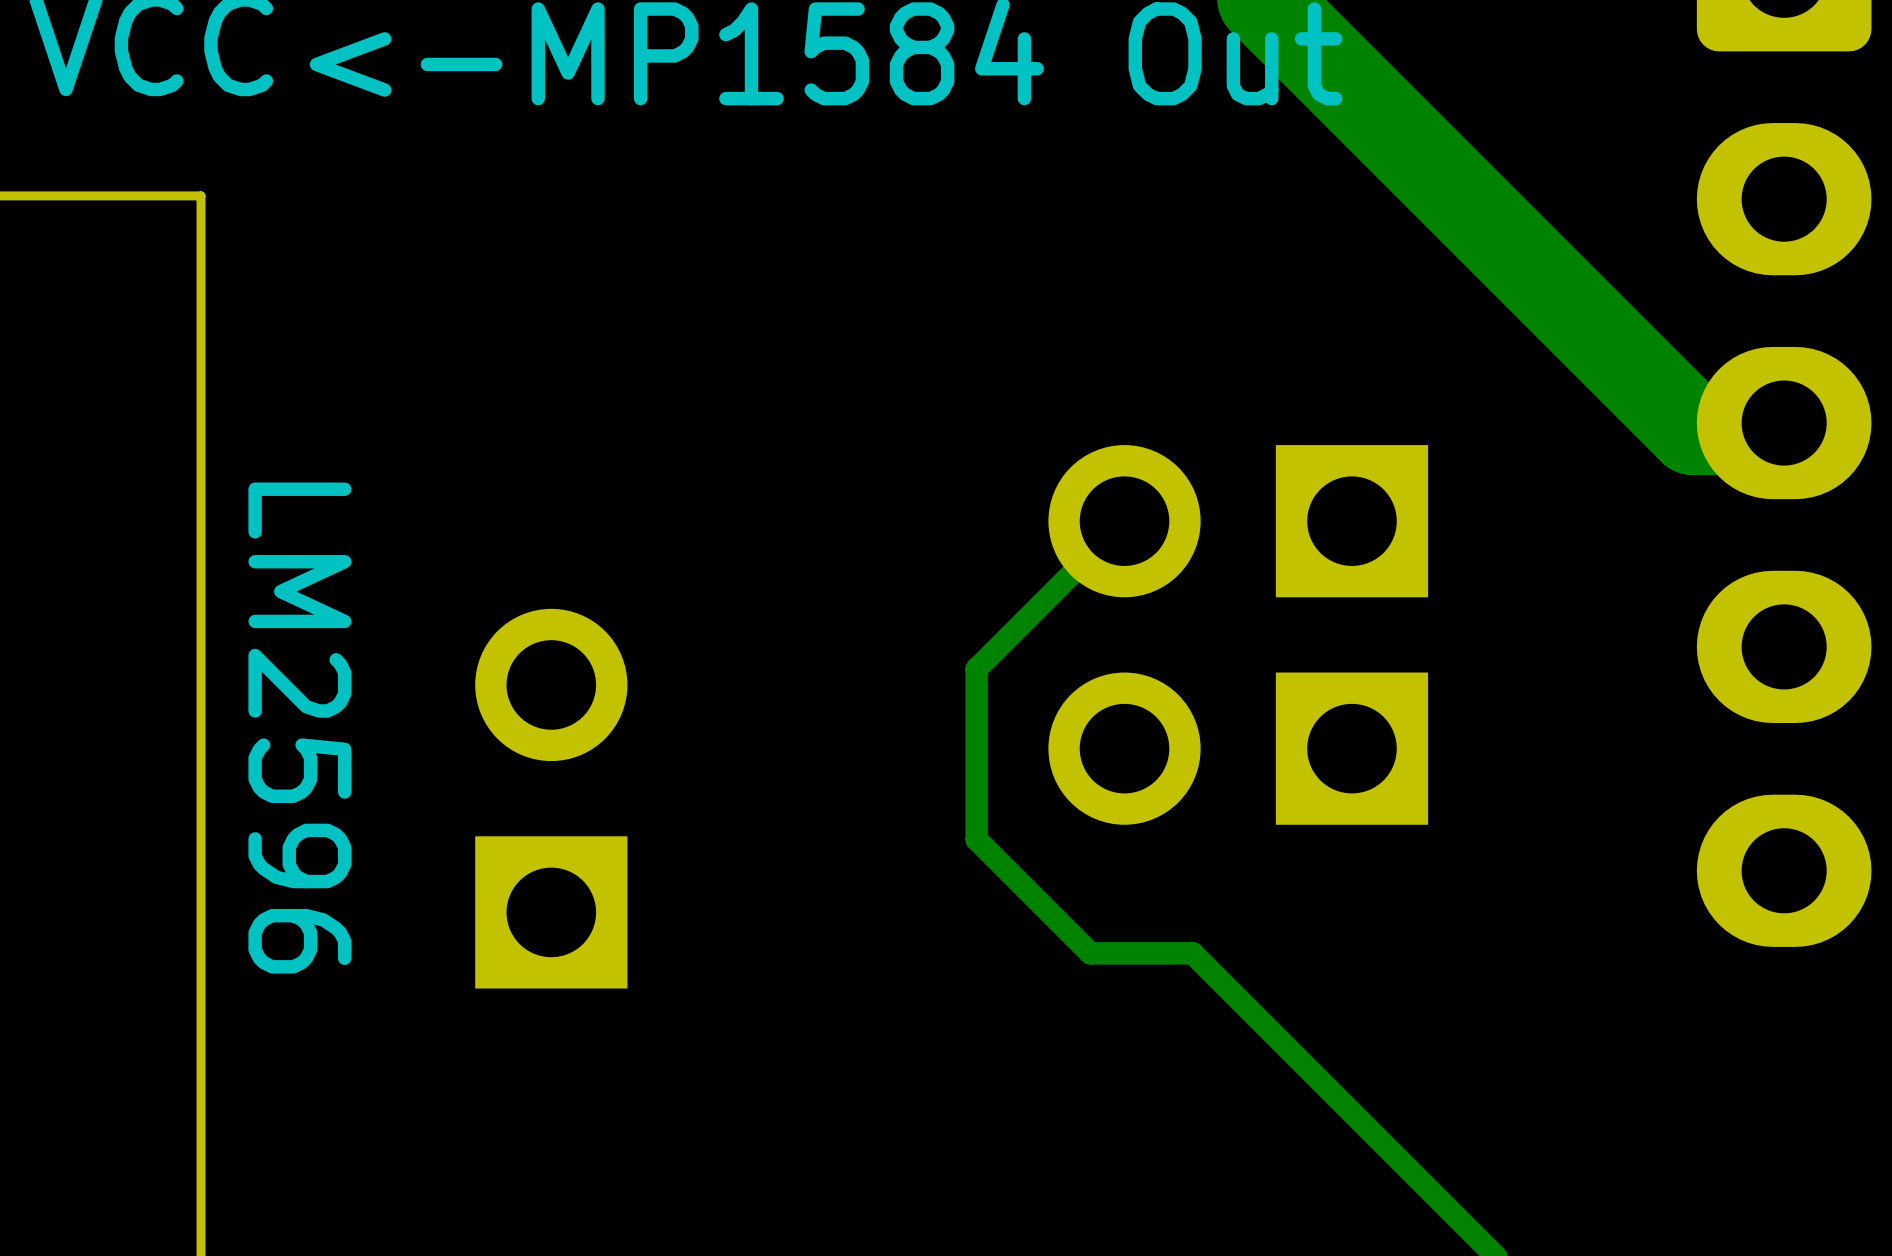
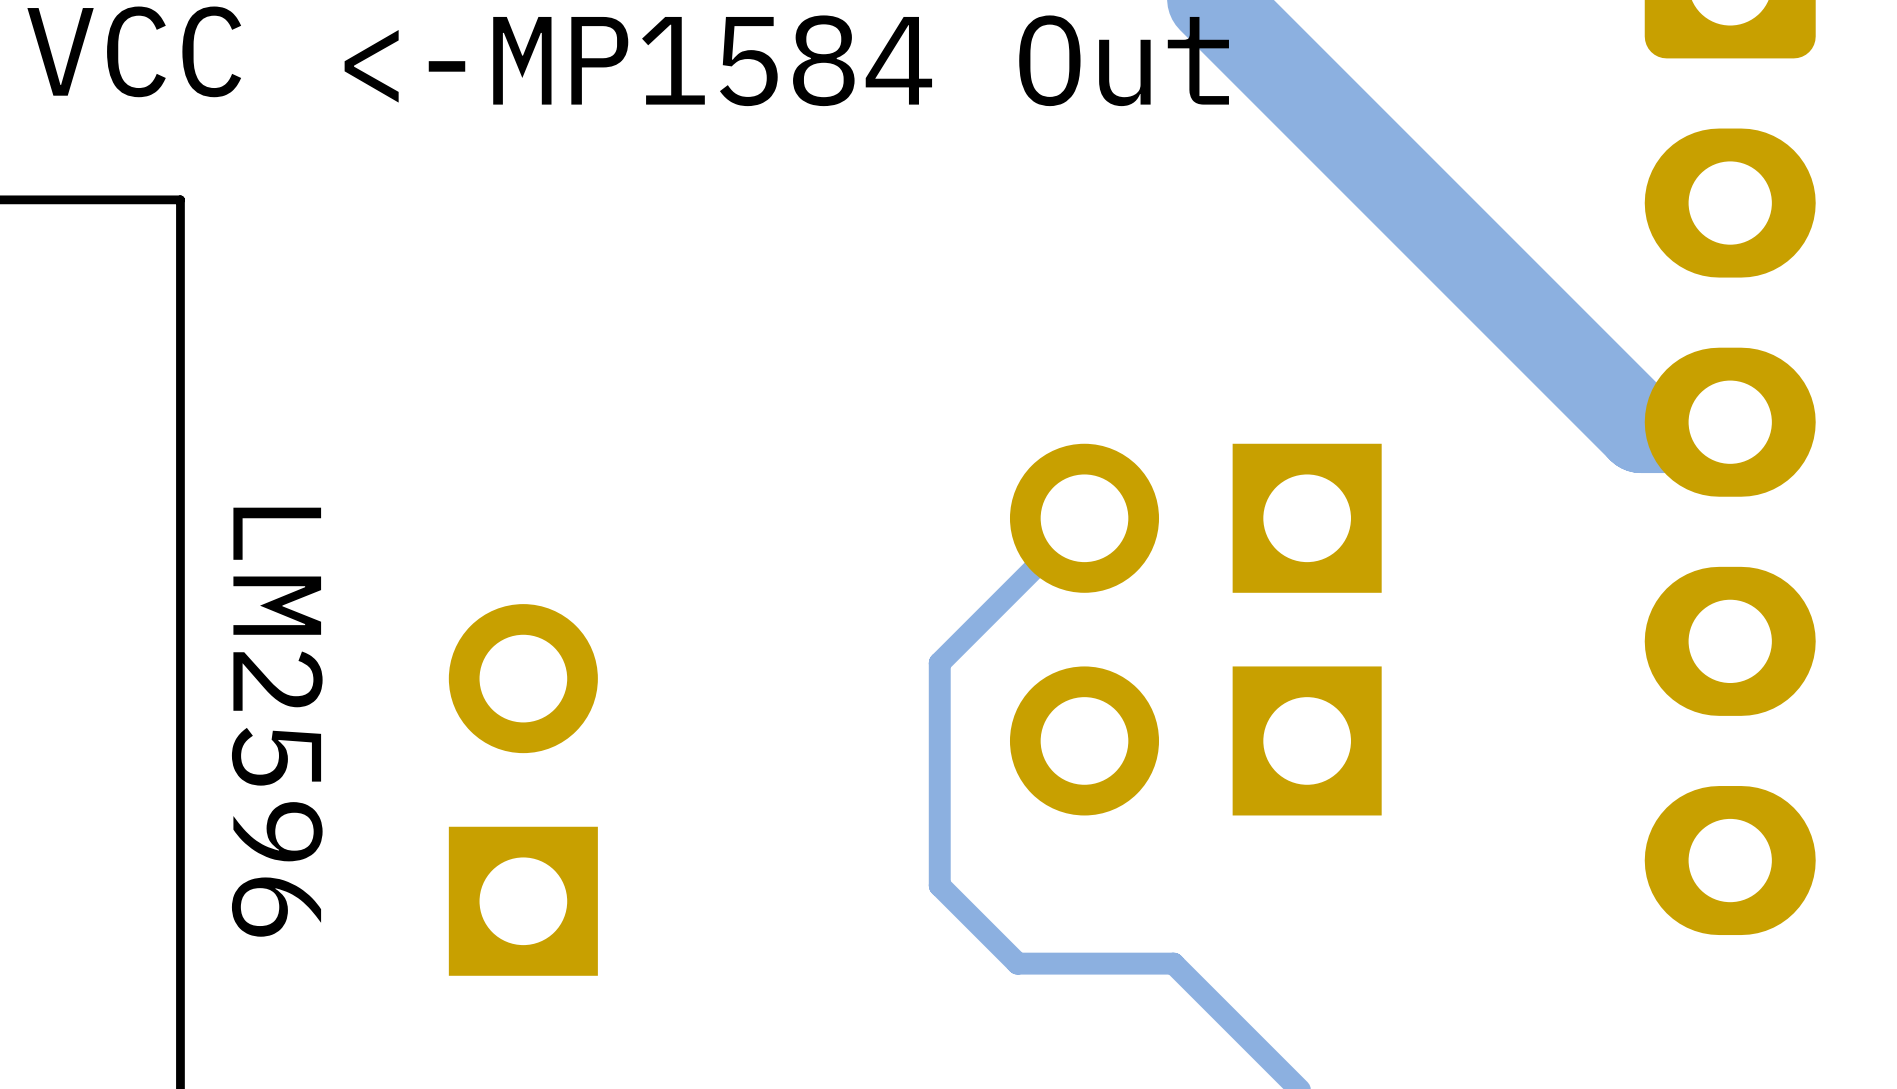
track: (976, 839) (1090, 953) (1192, 953) (1215, 976) -> (939, 830) (939, 885) (1017, 963) (1173, 963)

